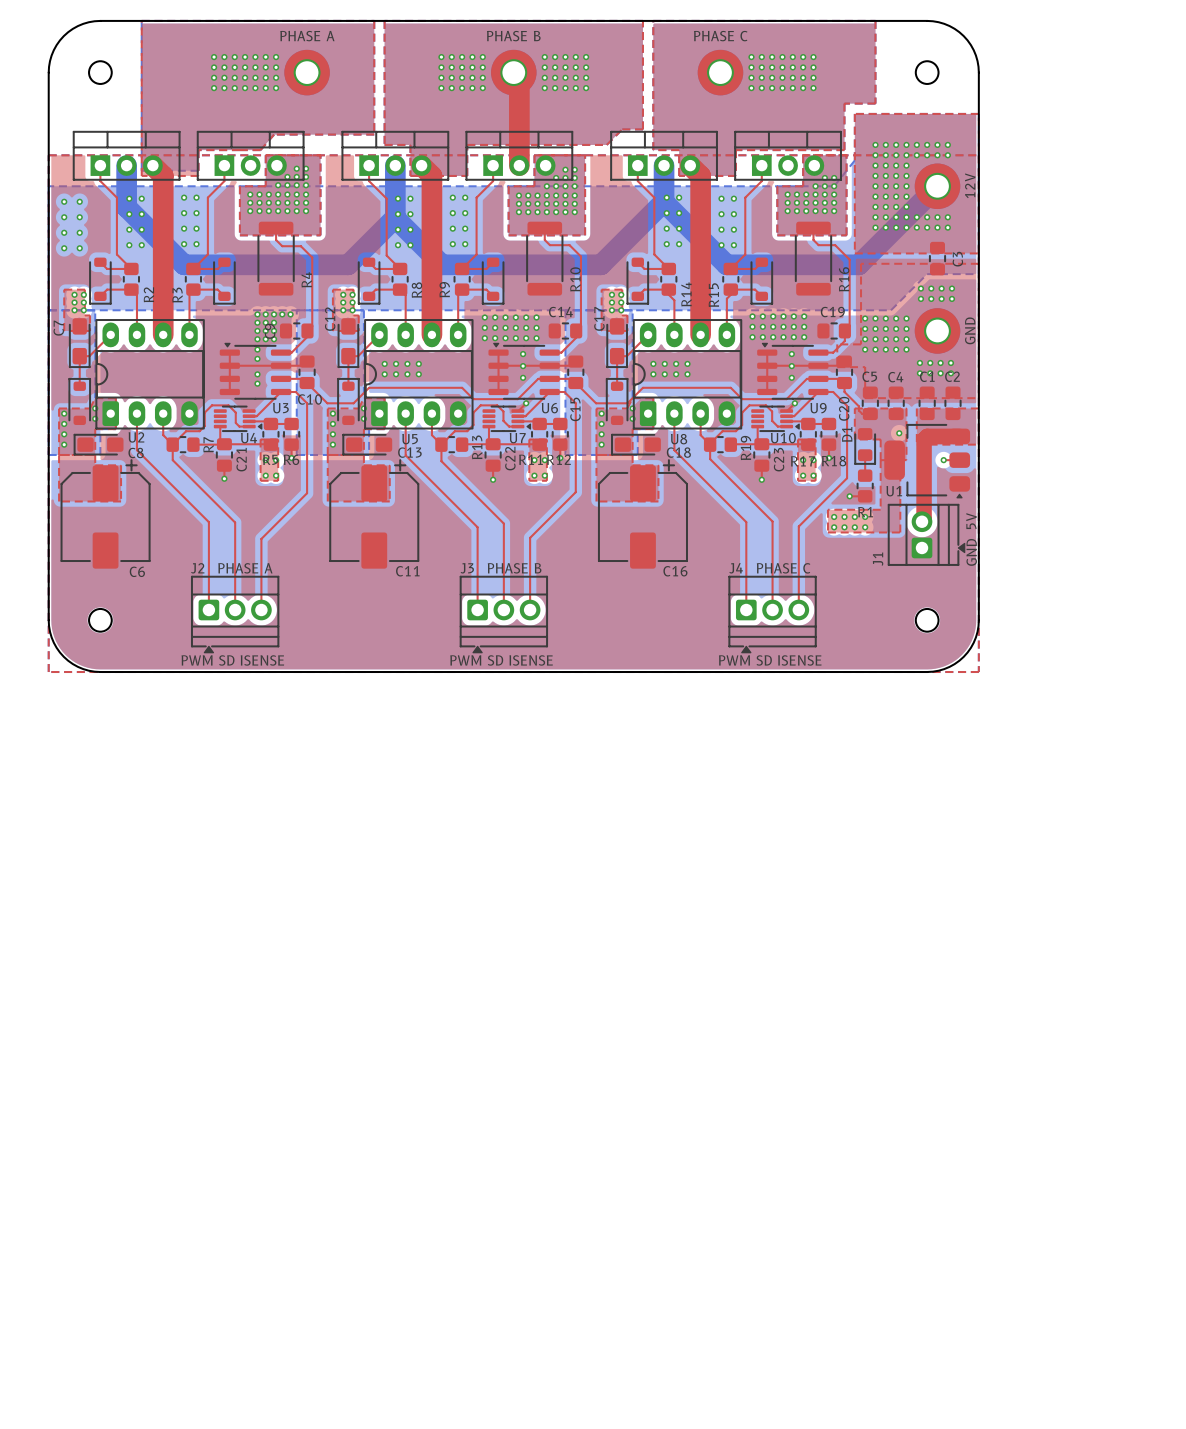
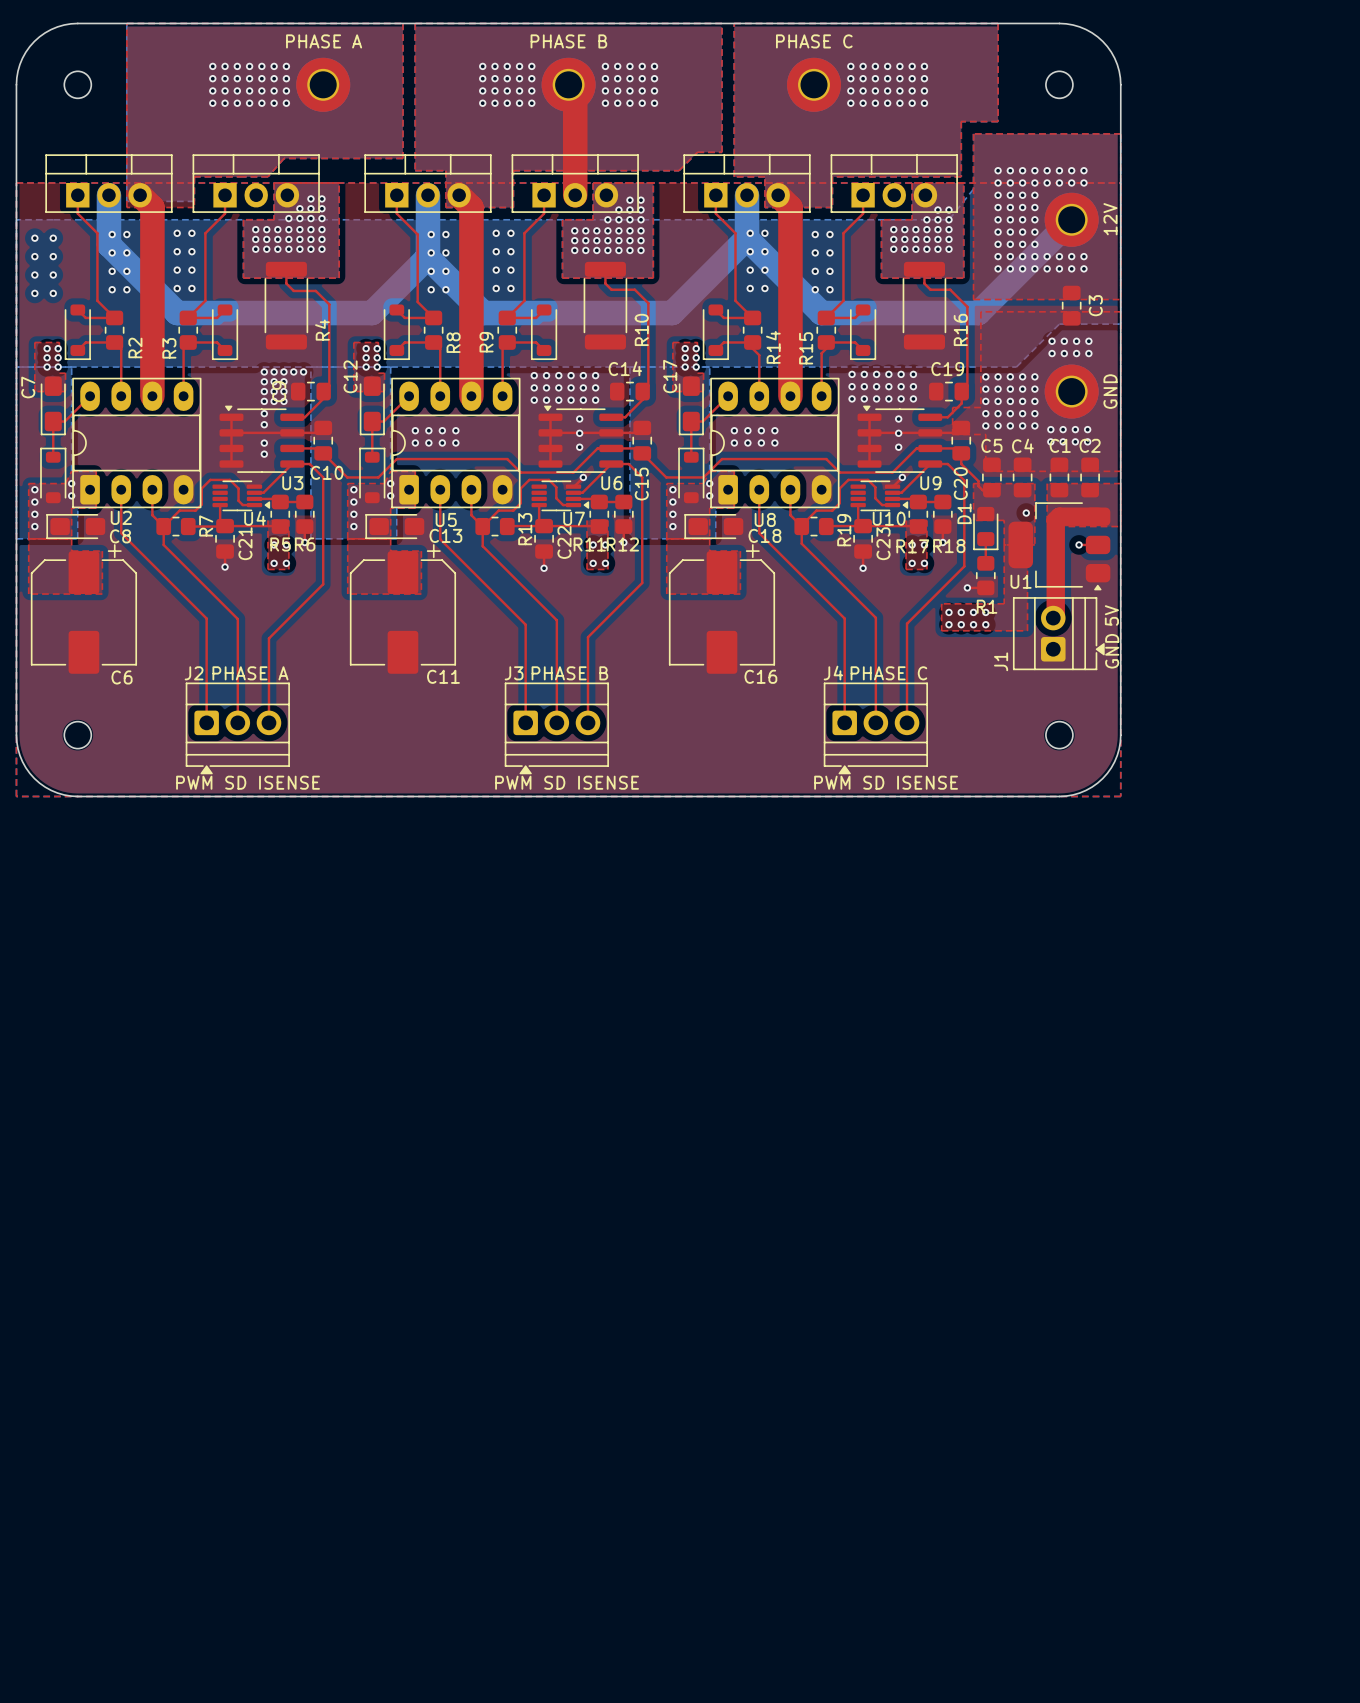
via: none -> (985, 425)
via: none -> (998, 425)
via: none -> (1010, 425)
via: none -> (1022, 425)
via: none -> (1034, 425)

